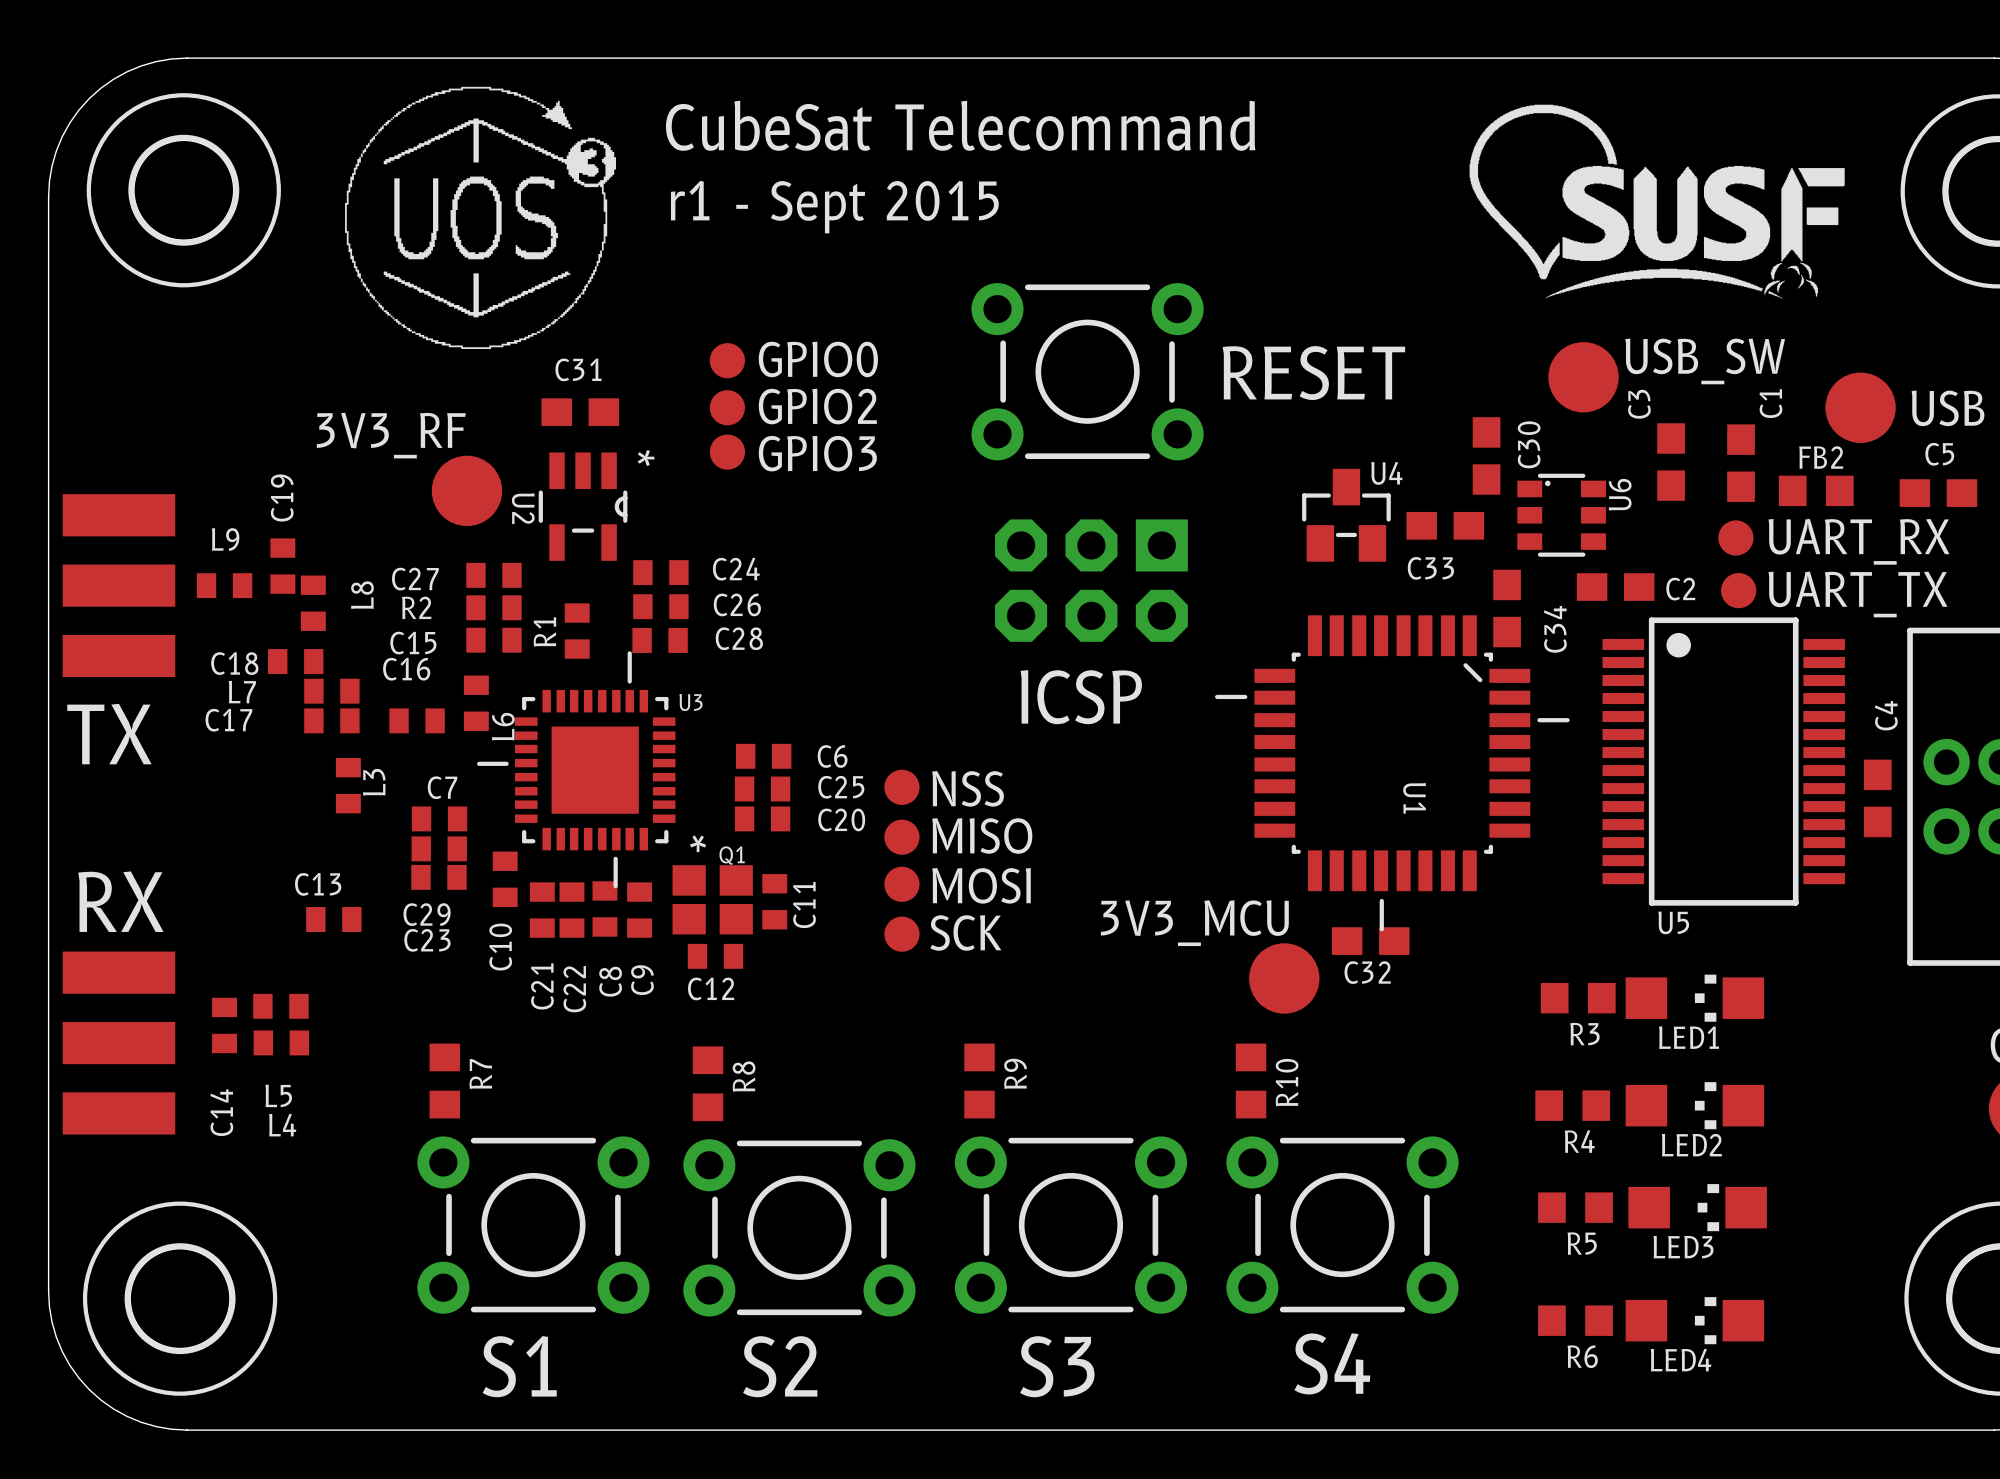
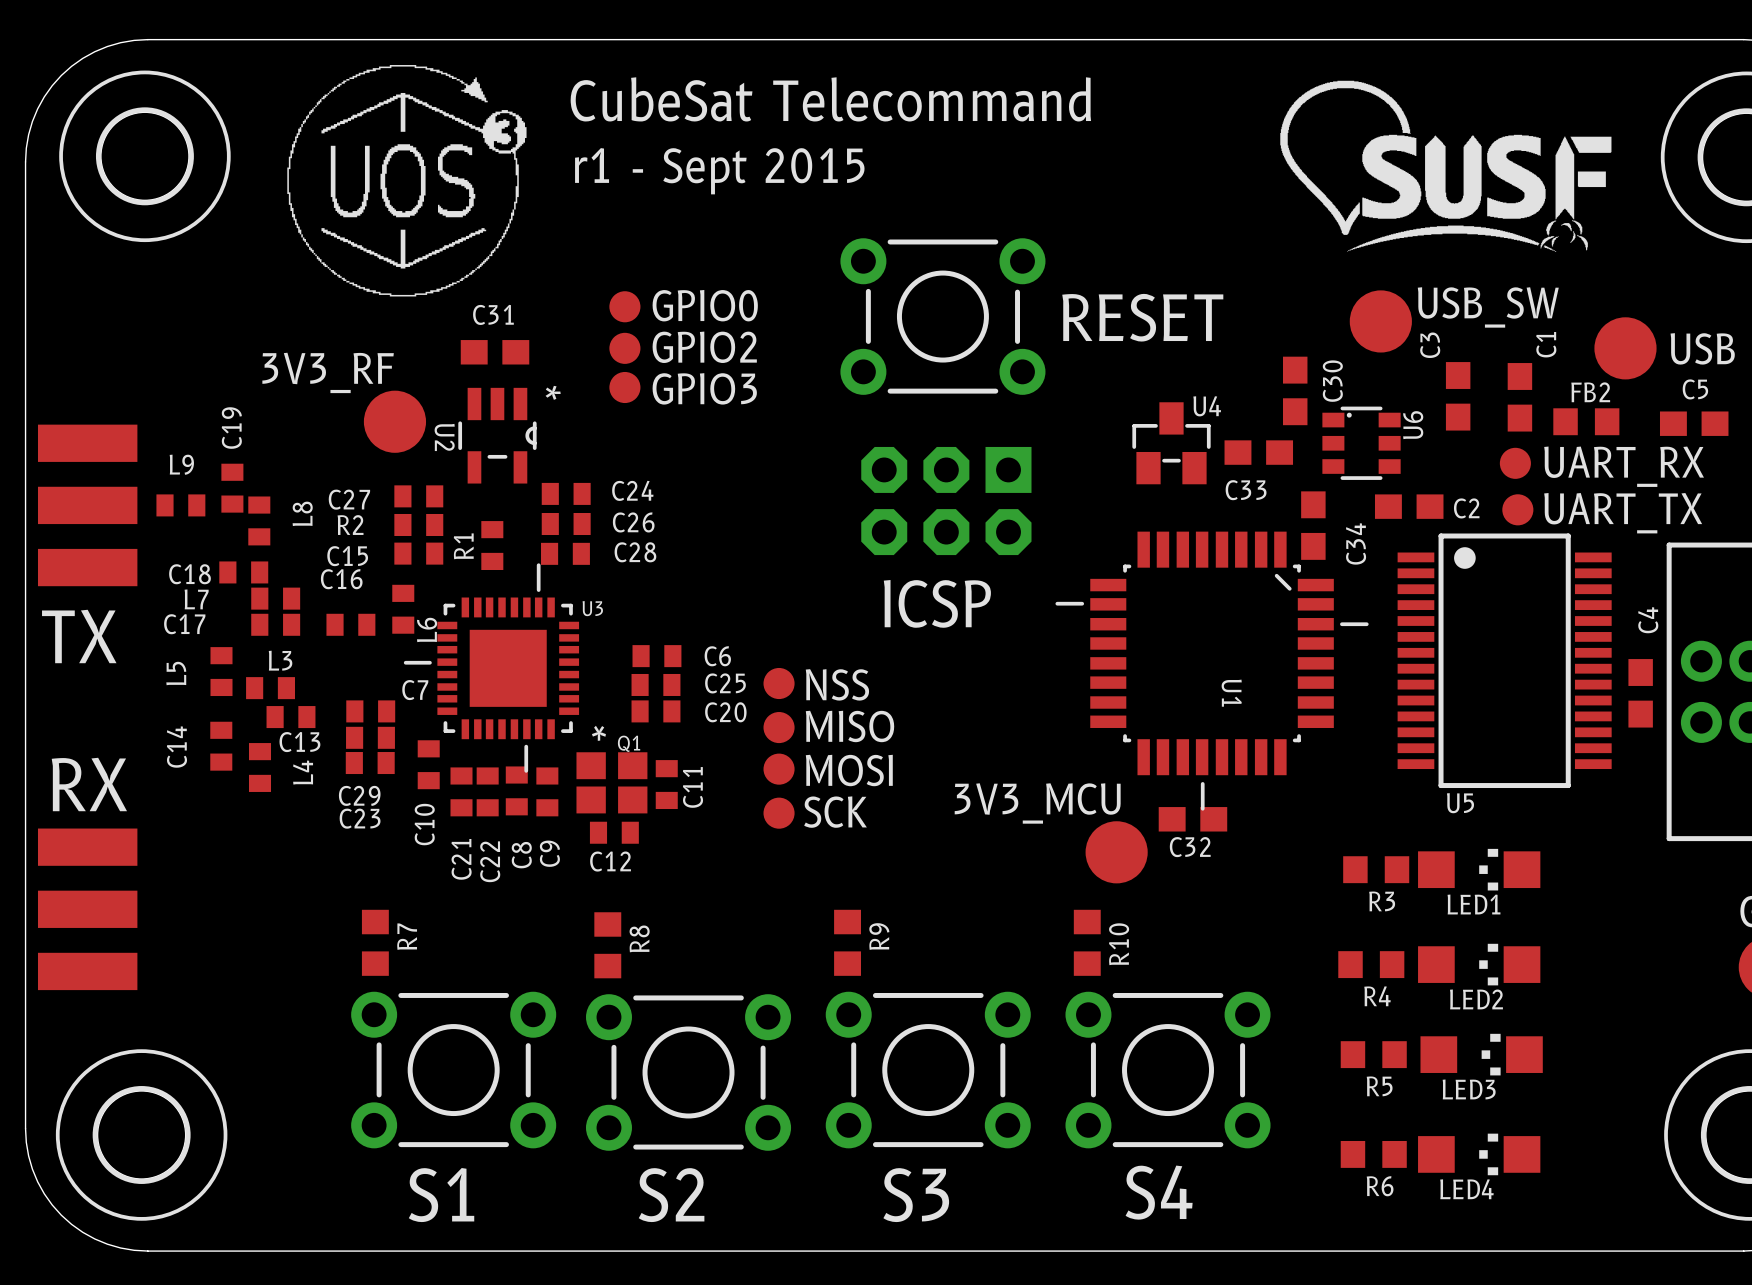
L3 rotation: 0° (348, 785) -> 90° clockwise (270, 688)
C7 name position: C7 (442, 787) -> C7 (415, 690)
C13 name position: C13 (318, 884) -> C13 (299, 742)
C13 position: (333, 919) -> (290, 717)
L5 rotation: 0° (280, 1006) -> 90° clockwise (221, 671)
L5 position: (280, 1006) -> (221, 671)
C14 position: (224, 1025) -> (221, 746)
L4 rotation: 0° (281, 1042) -> 90° clockwise (260, 767)
L4 position: (281, 1042) -> (260, 767)
C14 name position: C14 (221, 1112) -> C14 (176, 747)
L4 name position: L4 (282, 1125) -> L4 (303, 772)

